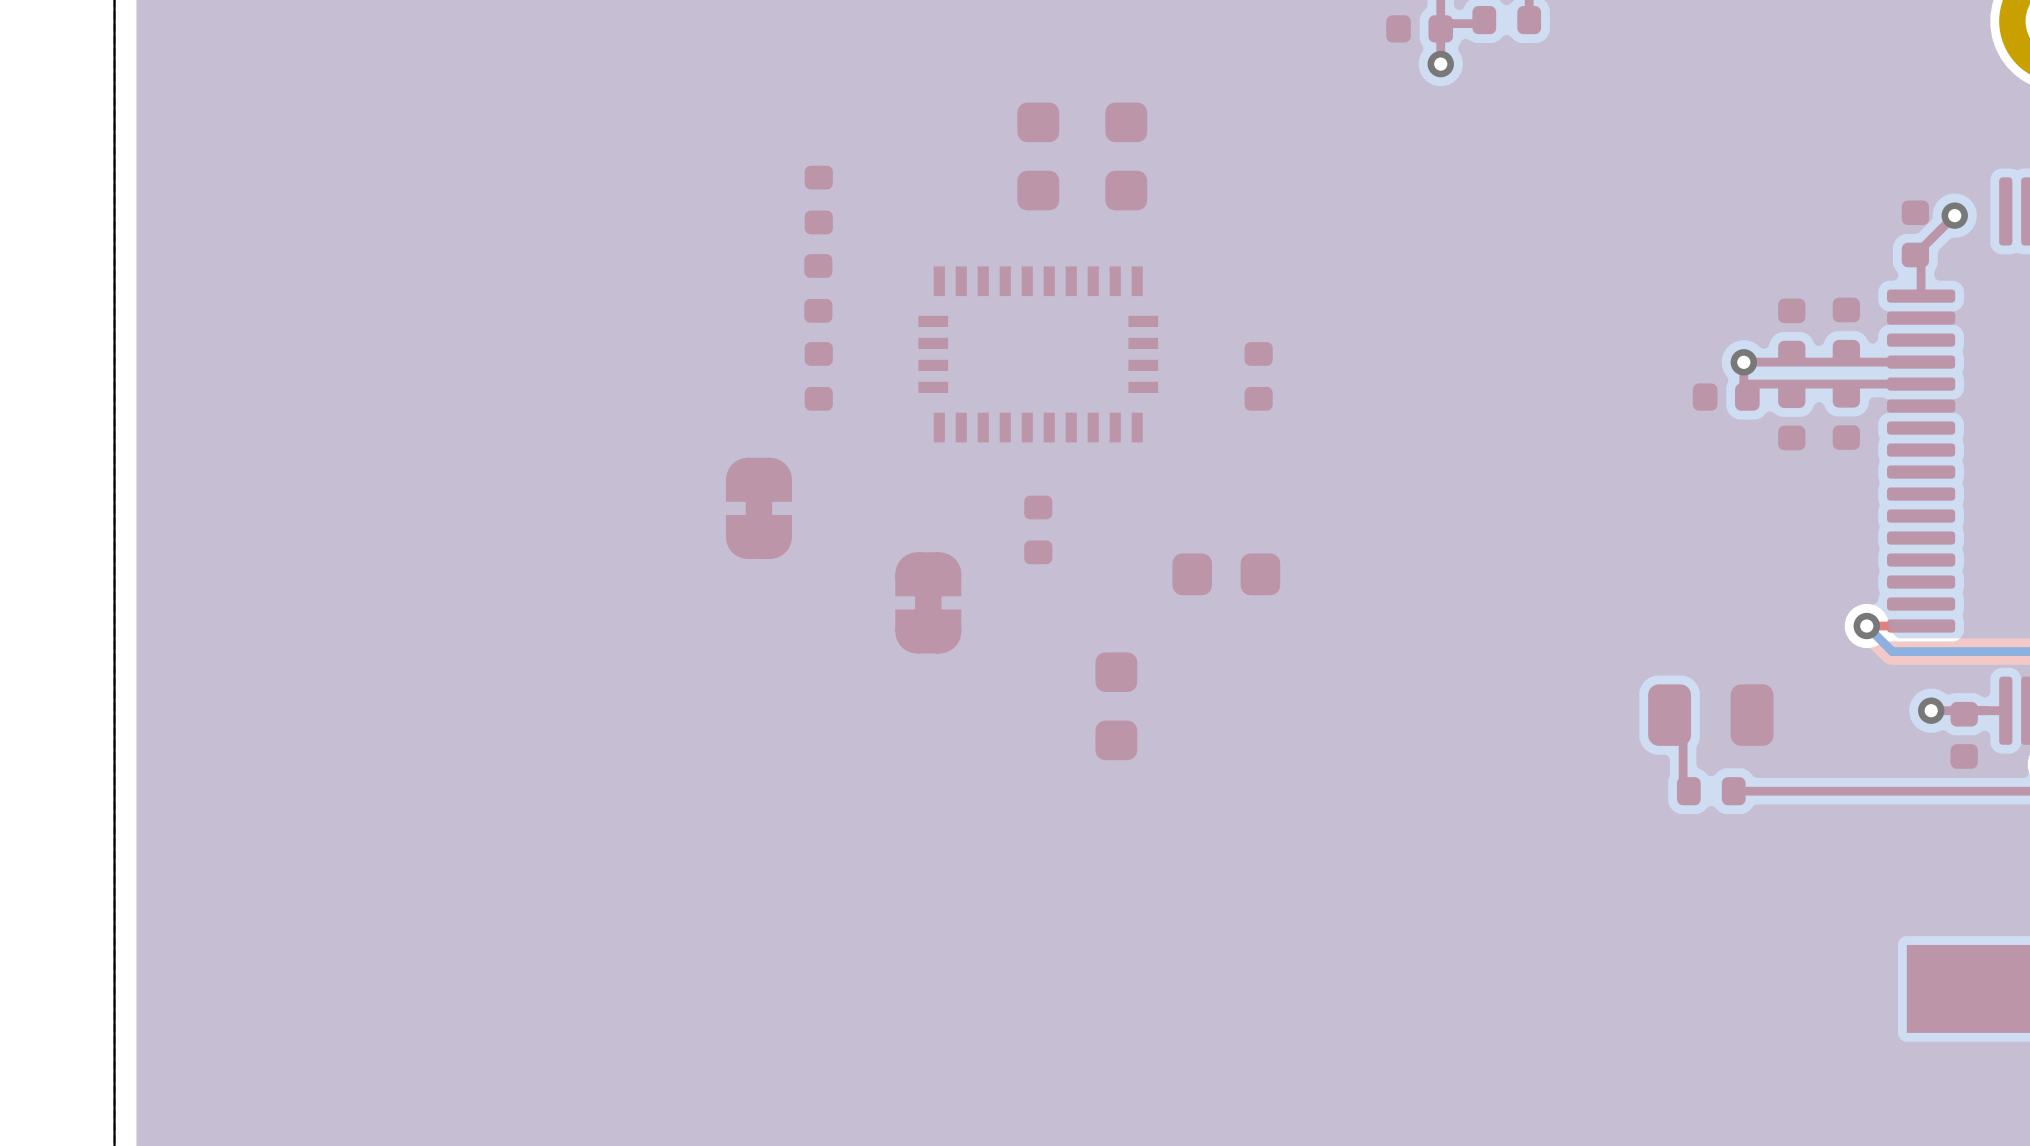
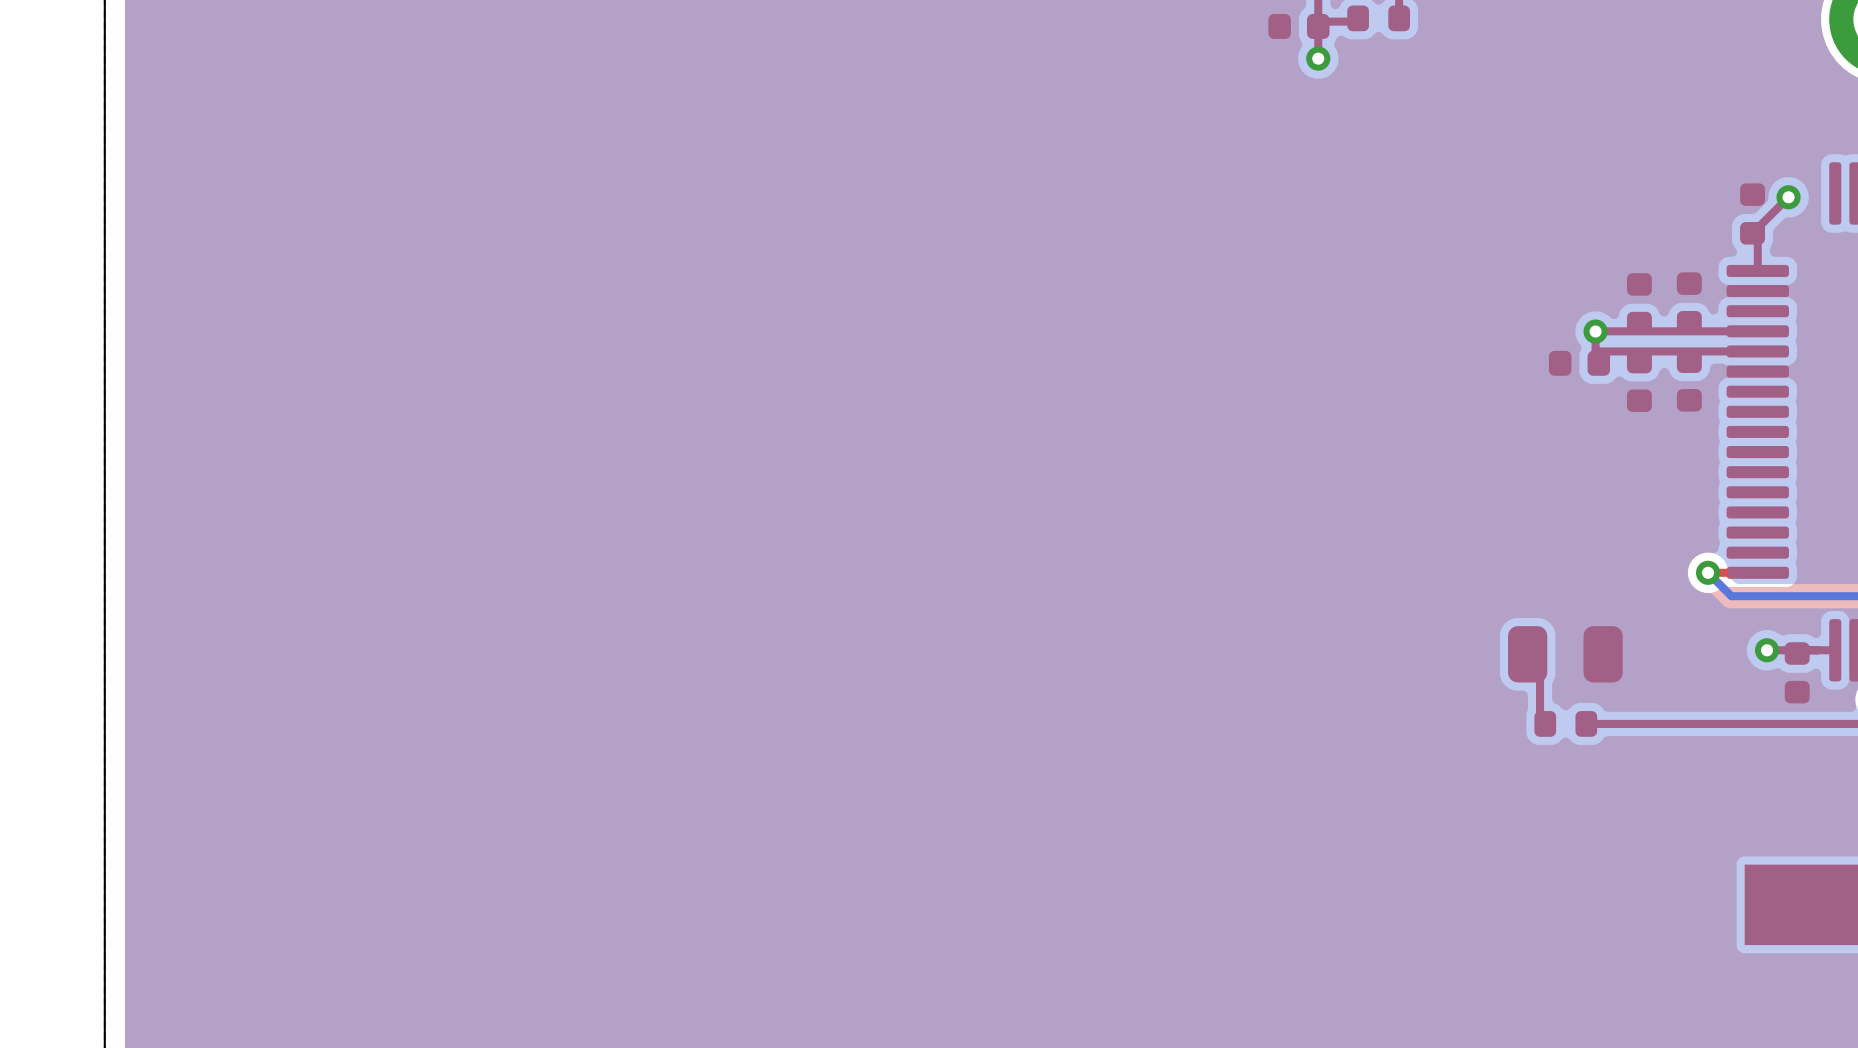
part: (1038, 156) -> none
part: (1126, 156) -> none
part: (818, 200) -> none
part: (818, 288) -> none
part: (1038, 354) -> none
part: (818, 376) -> none
part: (1258, 376) -> none
part: (758, 508) -> none
part: (1038, 529) -> none
part: (1226, 574) -> none
part: (928, 602) -> none
part: (1116, 706) -> none

